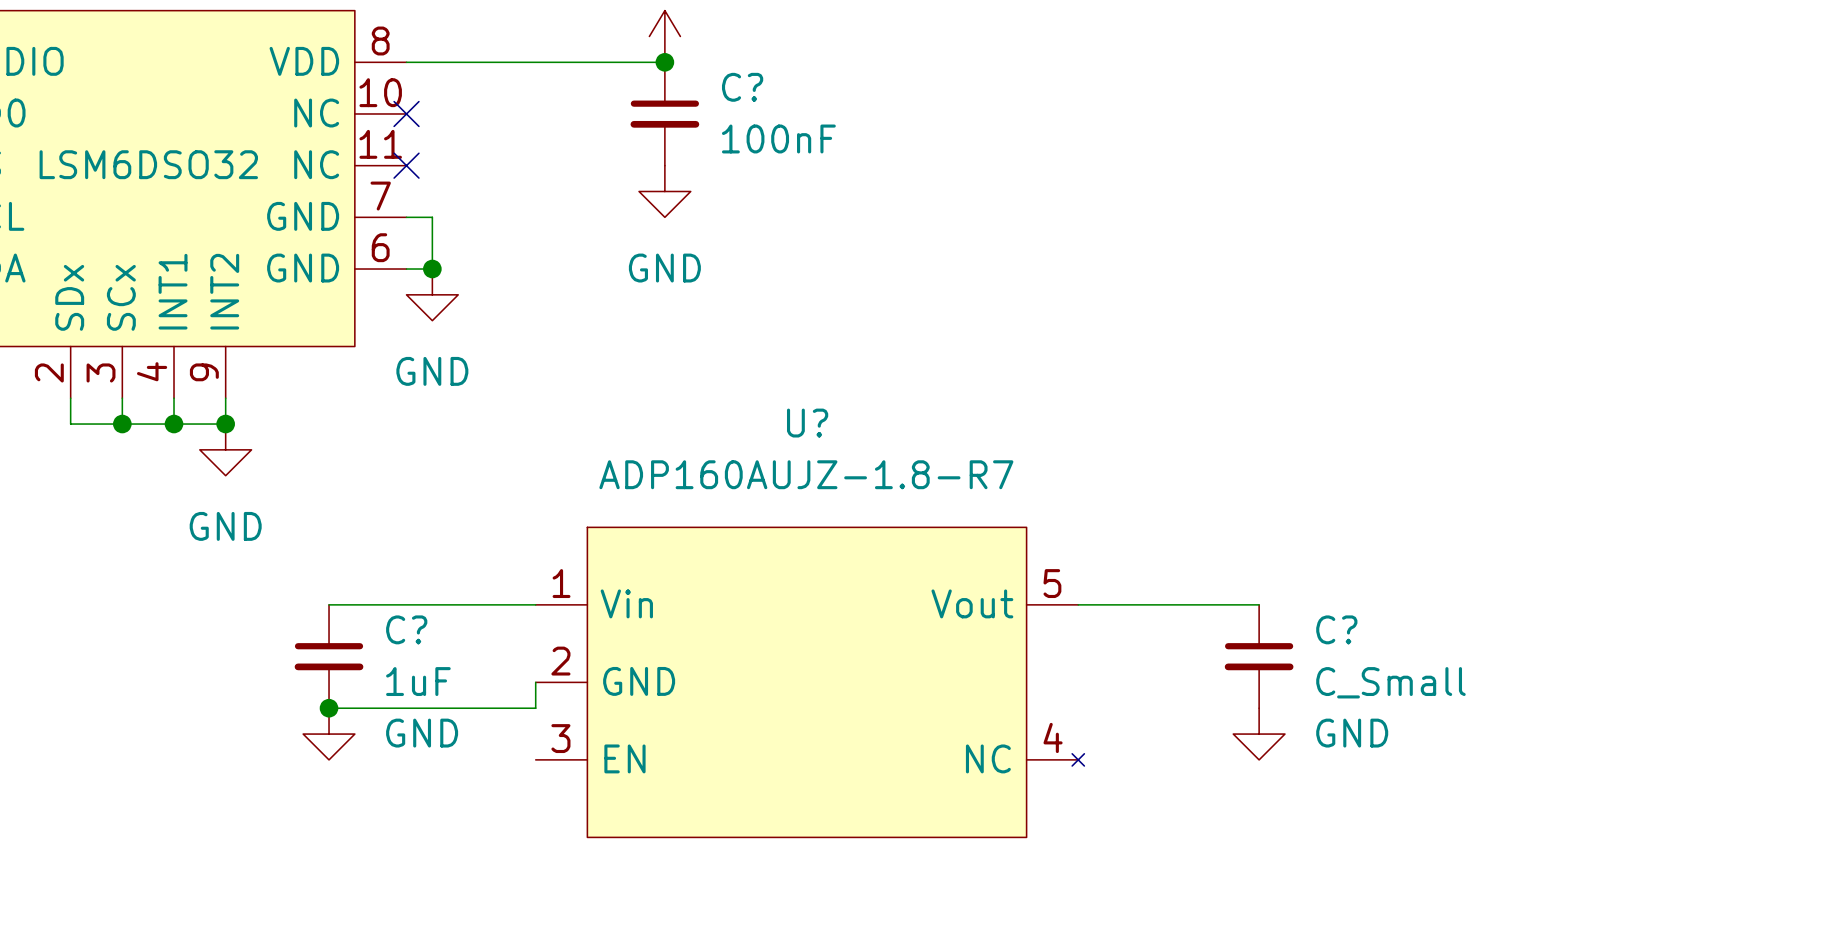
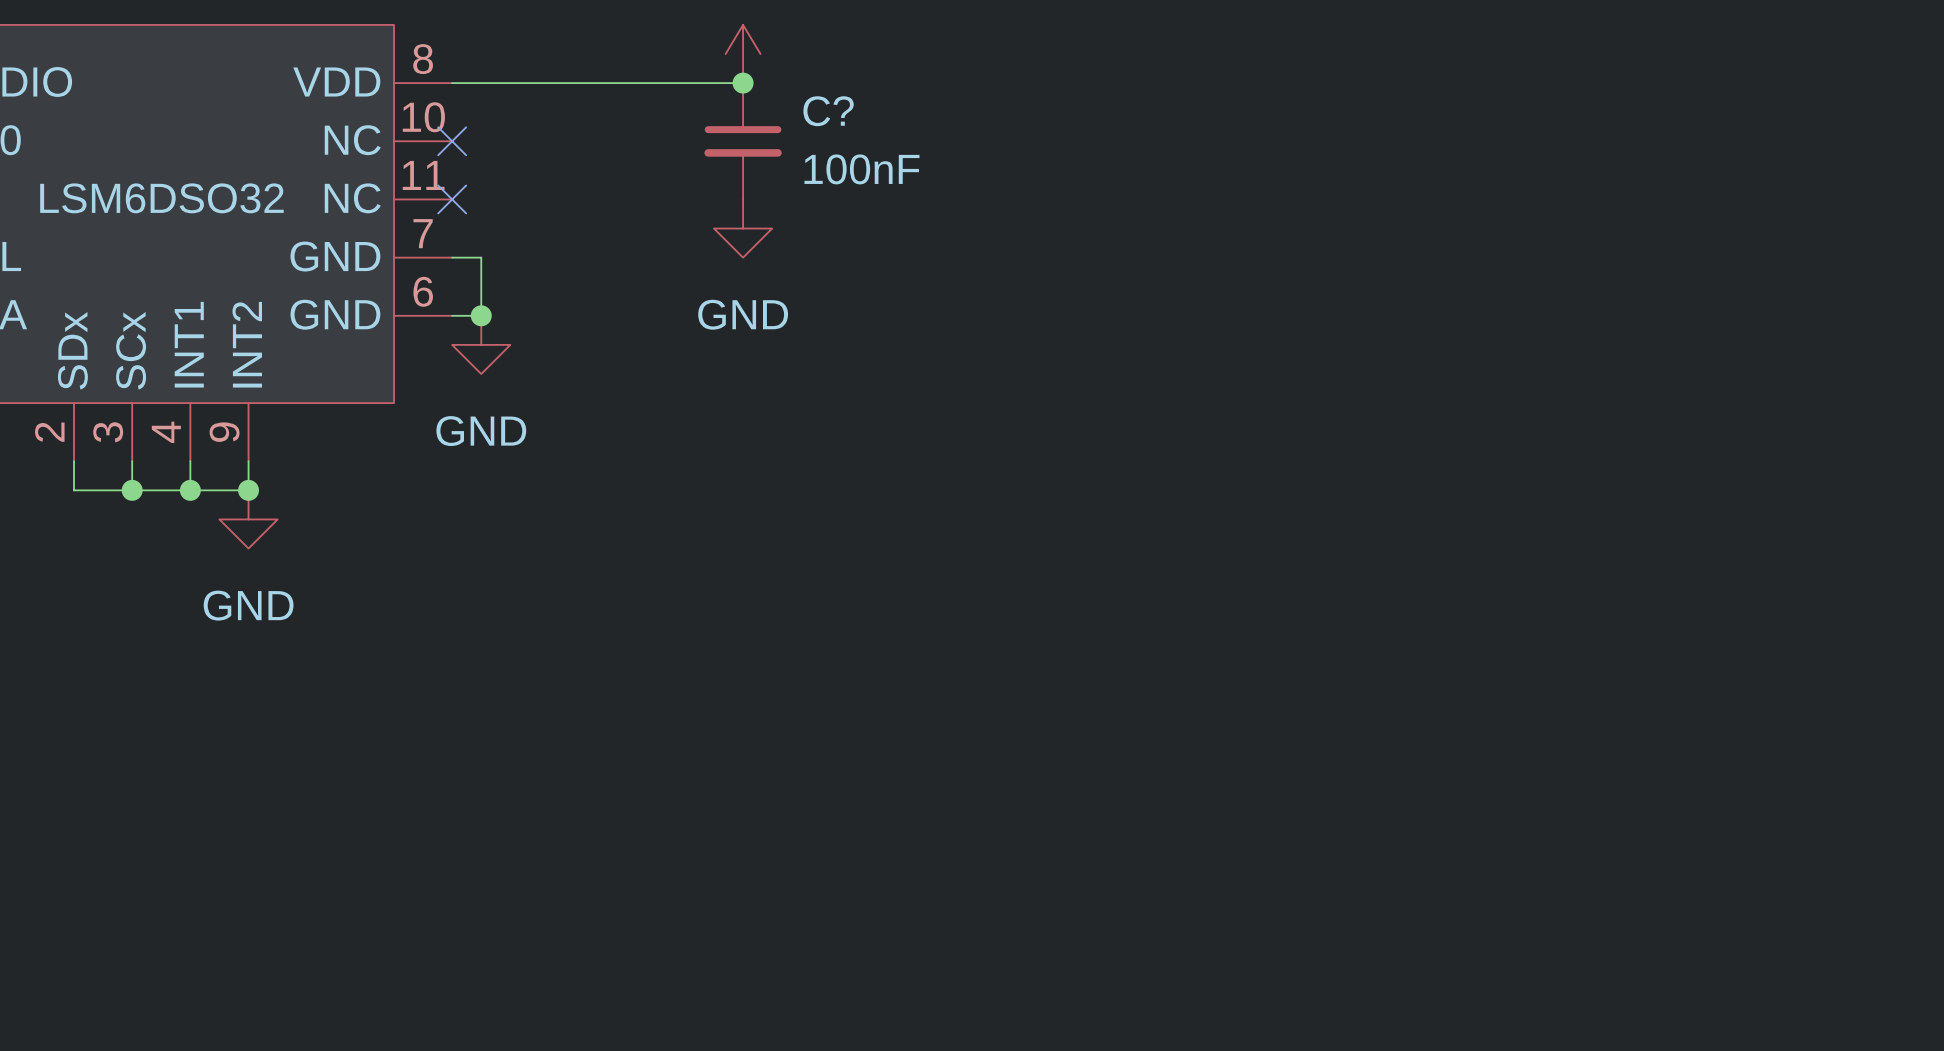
wire: (329, 604) (535, 604) -> none
wire: (1078, 604) (1259, 604) -> none
C?: 1uF (329, 656) -> none
C?: C_Small (1259, 656) -> none
wire: (535, 682) (535, 708) (329, 708) -> none
U?: ADP160AUJZ-1.8-R7 (810, 682) -> none
junction: (329, 708) -> none
power symbol: GND (329, 734) -> none
power symbol: GND (1259, 734) -> none

